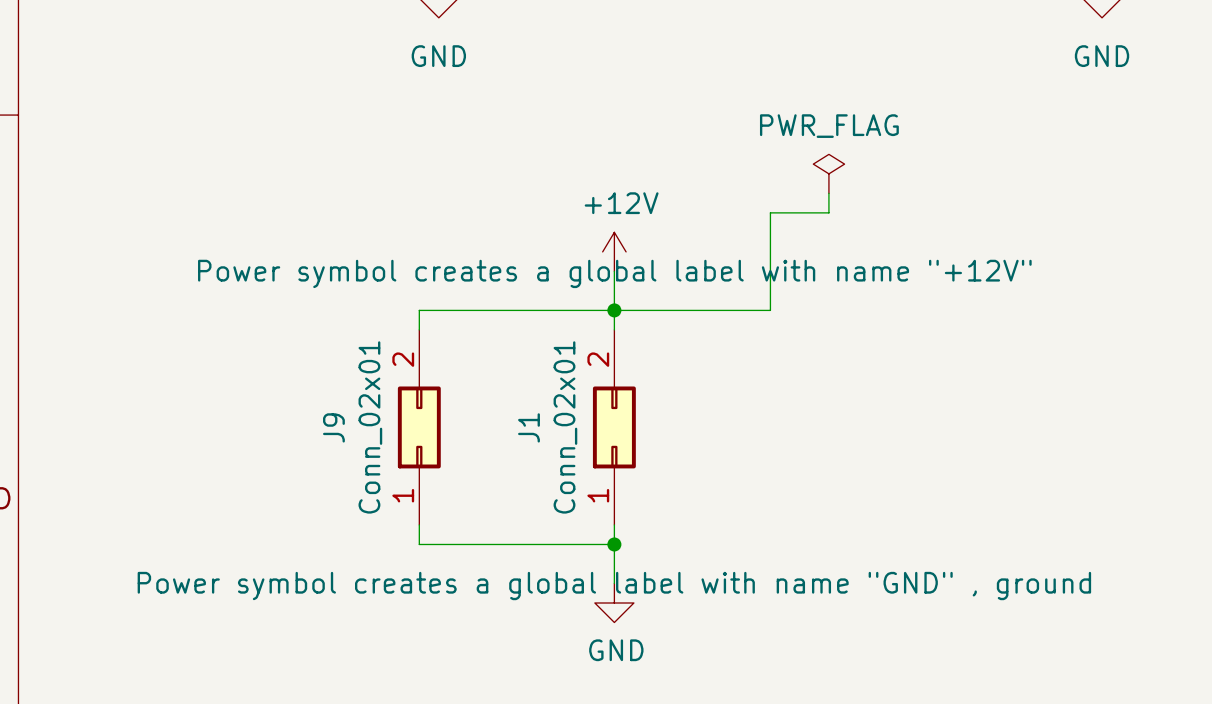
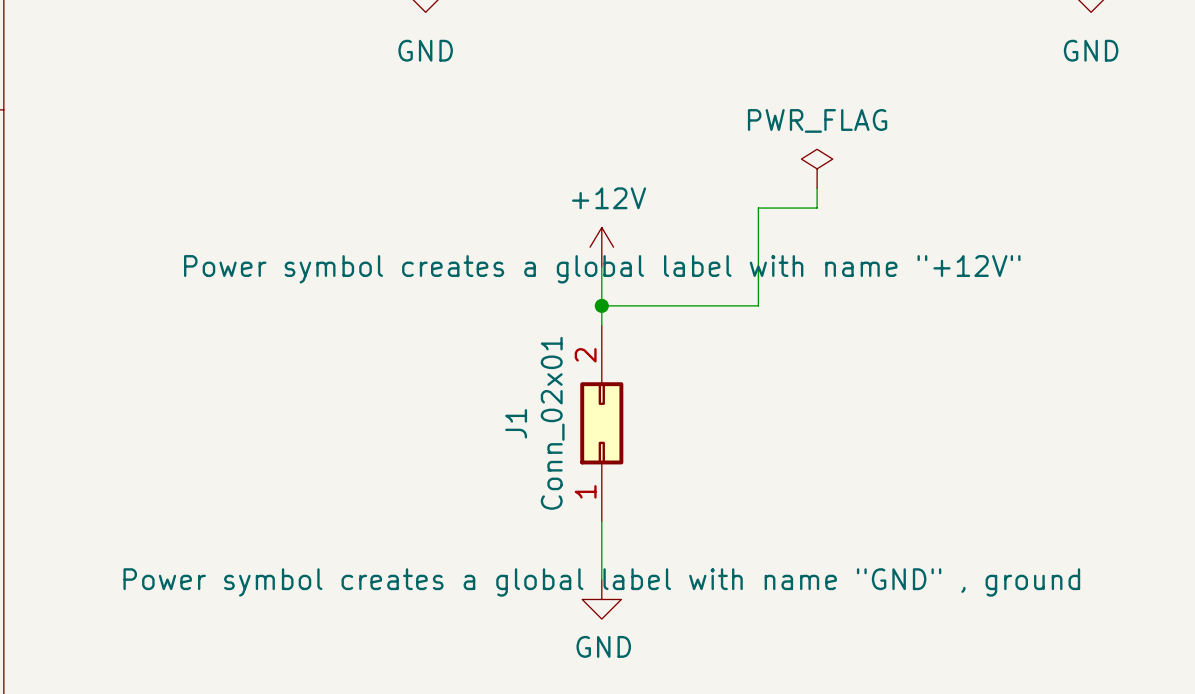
wire: (614, 310) (419, 310) (419, 329) -> none
J9: Conn_02x01 (419, 427) -> none
wire: (419, 524) (419, 544) (614, 544) -> none
junction: (614, 544) -> none

